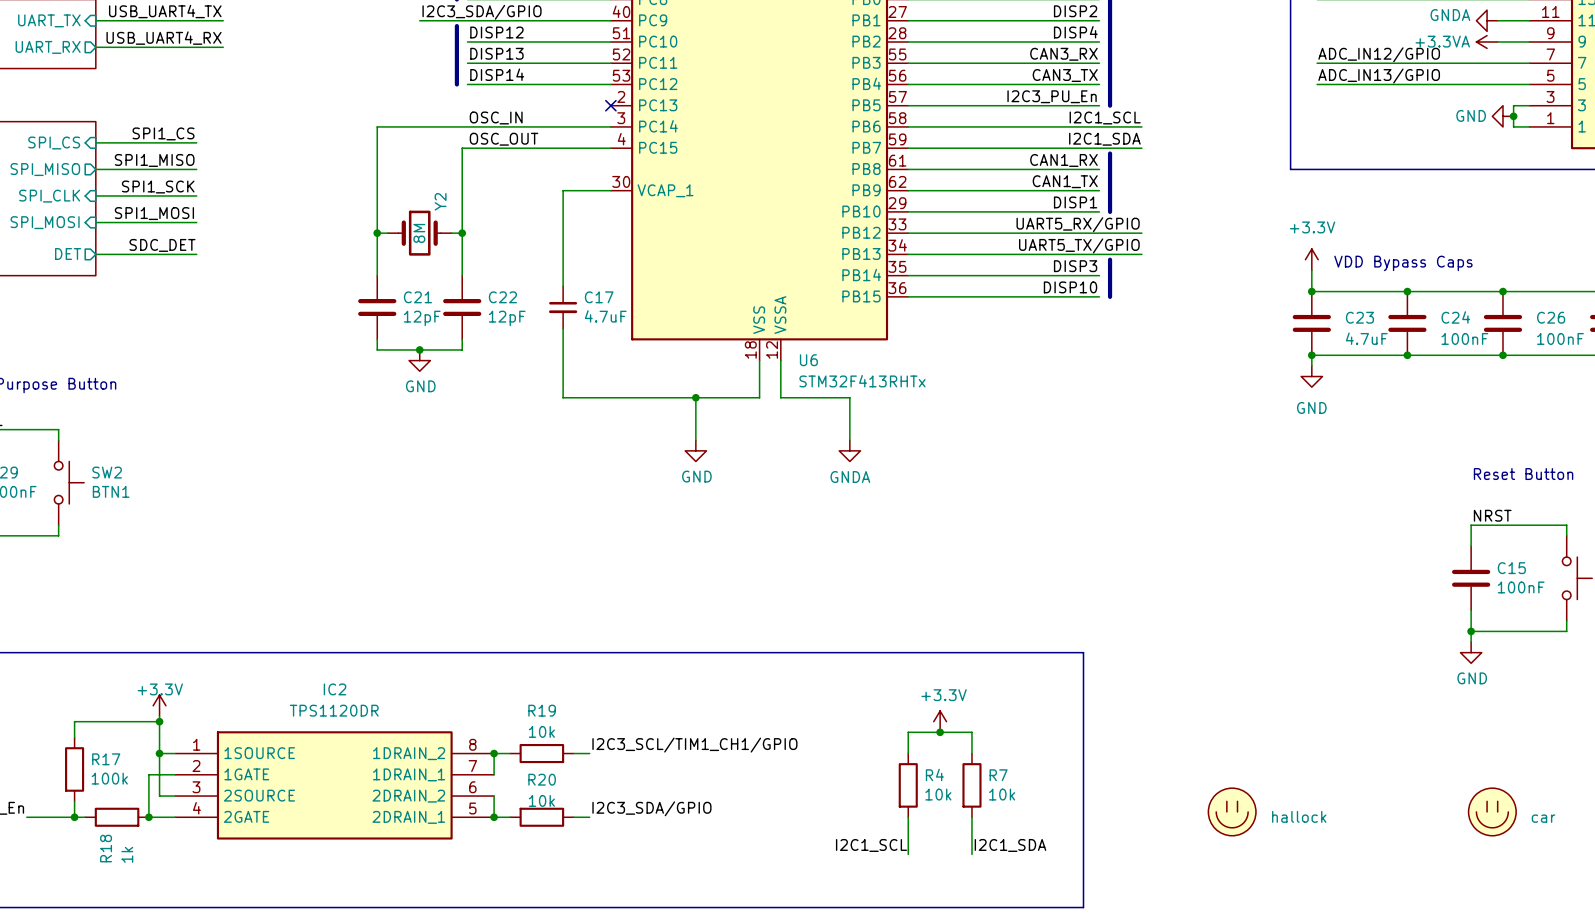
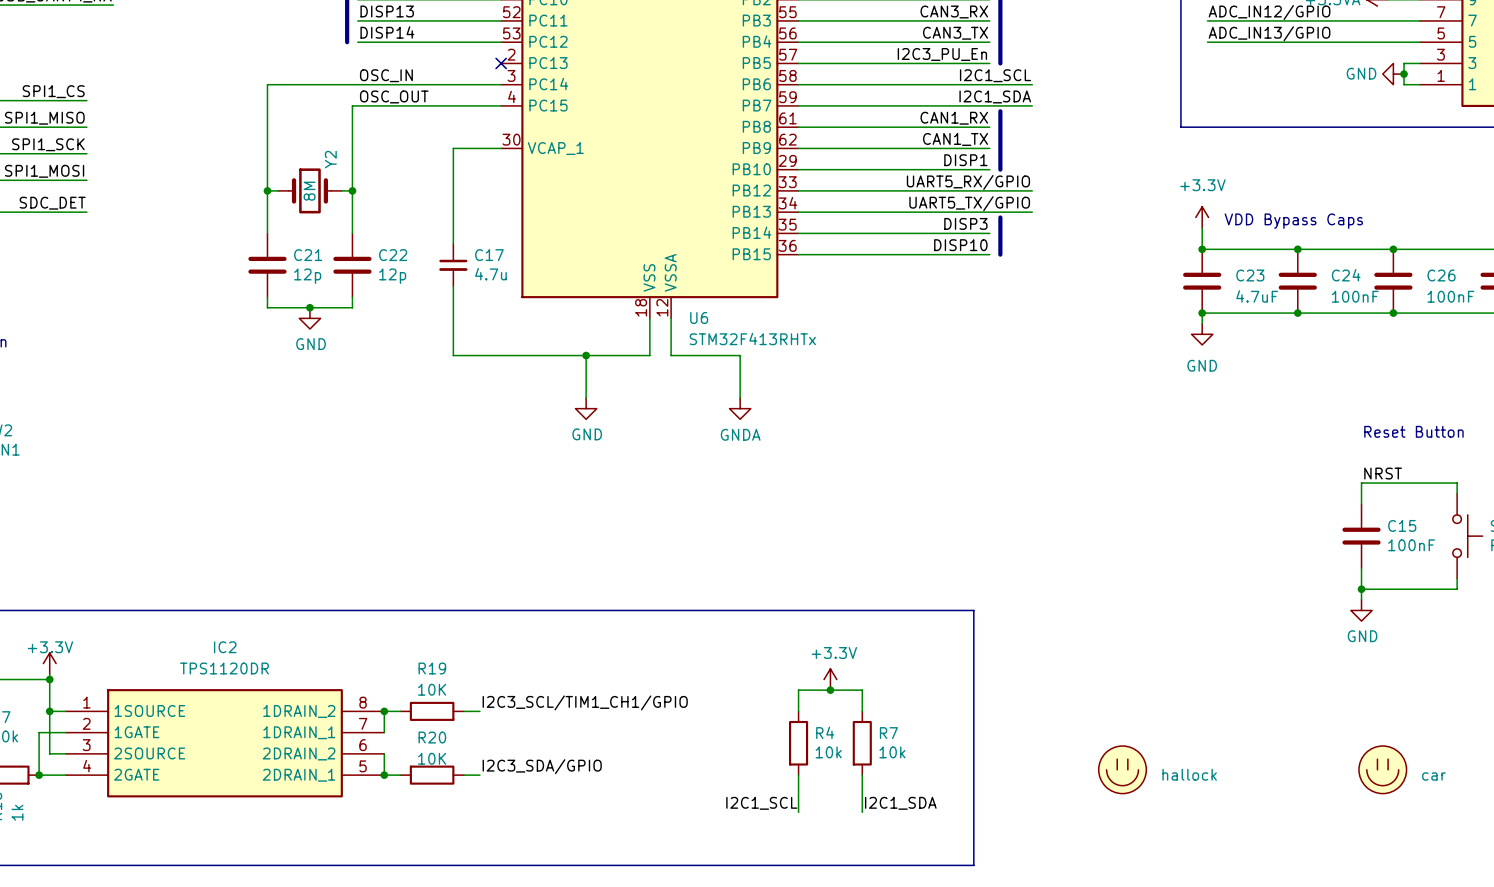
C17 value: 4.7uF (605, 316) -> 4.7u (490, 274)
C21 value: 12pF (422, 318) -> 12p (307, 276)
C22 value: 12pF (507, 318) -> 12p (392, 276)
R19 value: 10k (541, 731) -> 10K (432, 689)
R20 value: 10k (541, 800) -> 10K (432, 758)

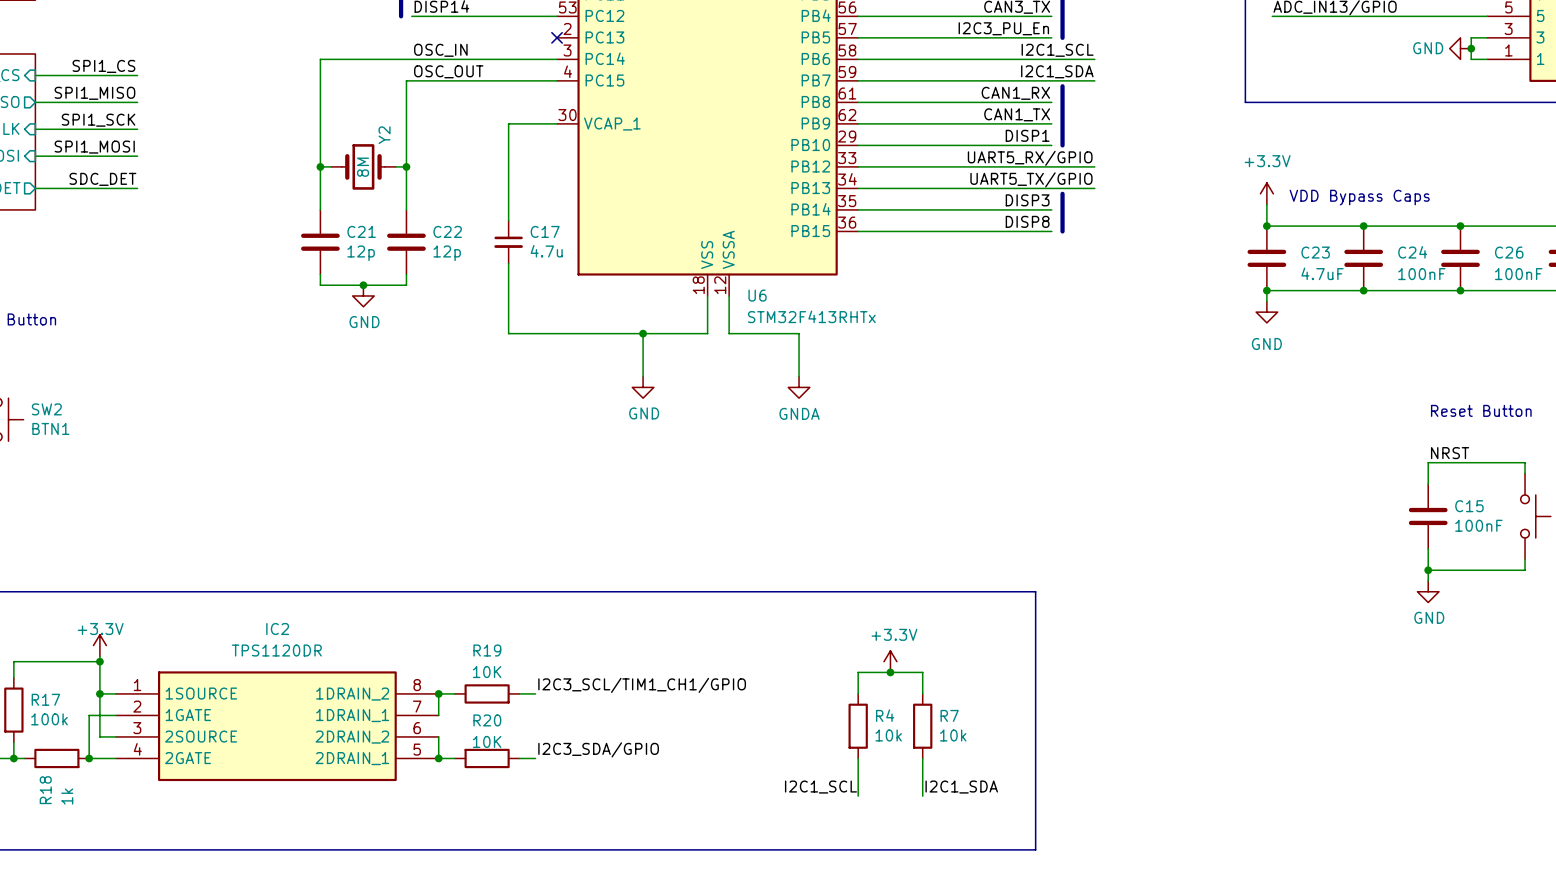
label: DISP10 (960, 245) -> DISP8 (1027, 221)
part: hallock (1122, 769) -> none
part: car (1382, 769) -> none

